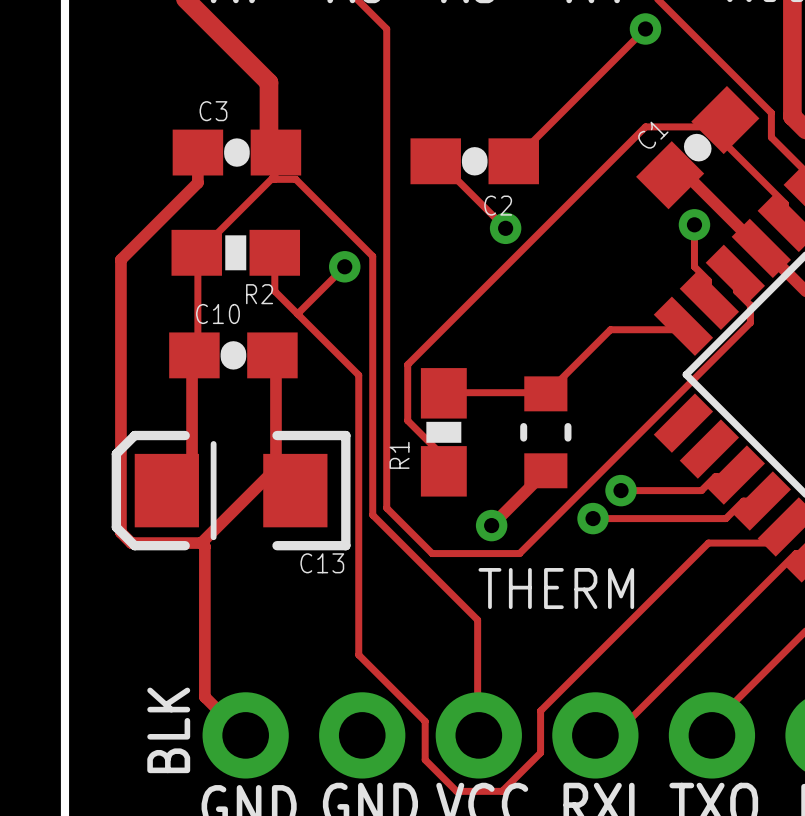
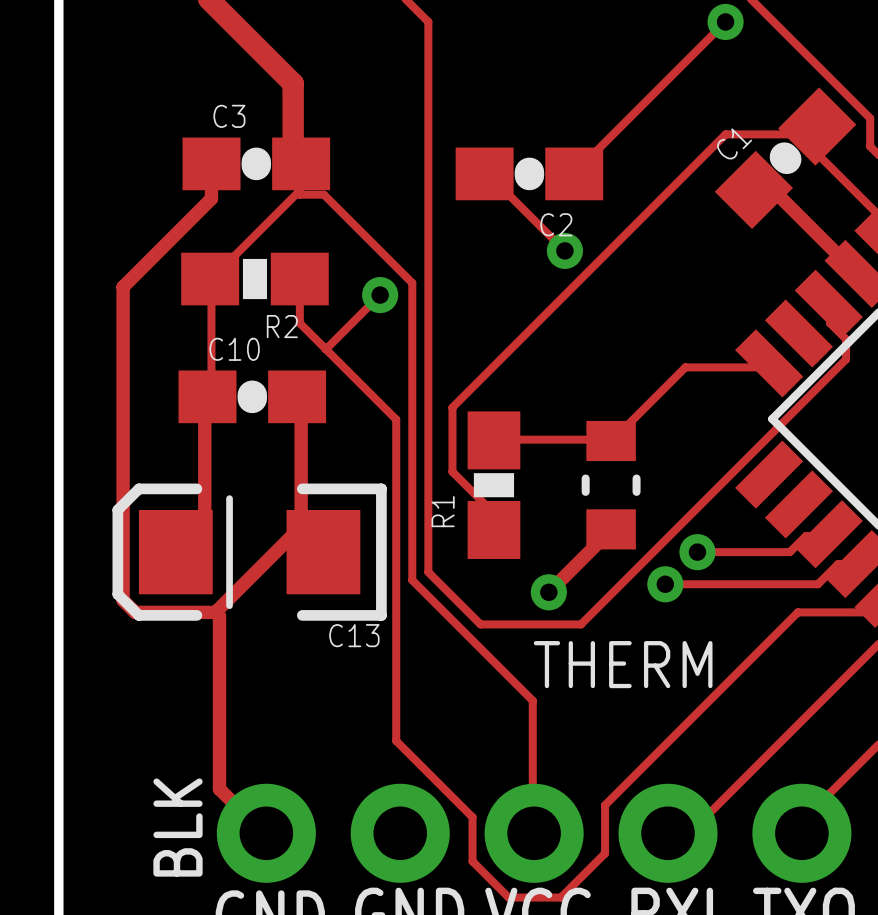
track: (694, 224) (694, 266) (708, 280) (709, 300) -> none
via: (694, 224) -> none

